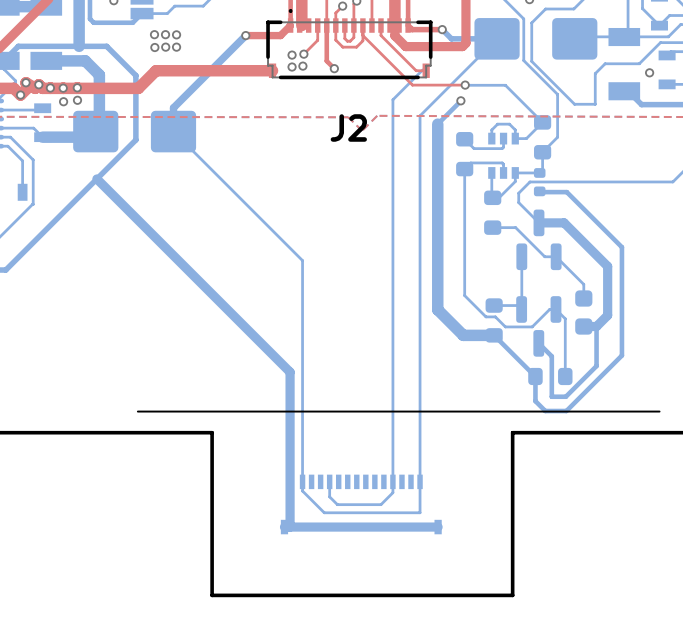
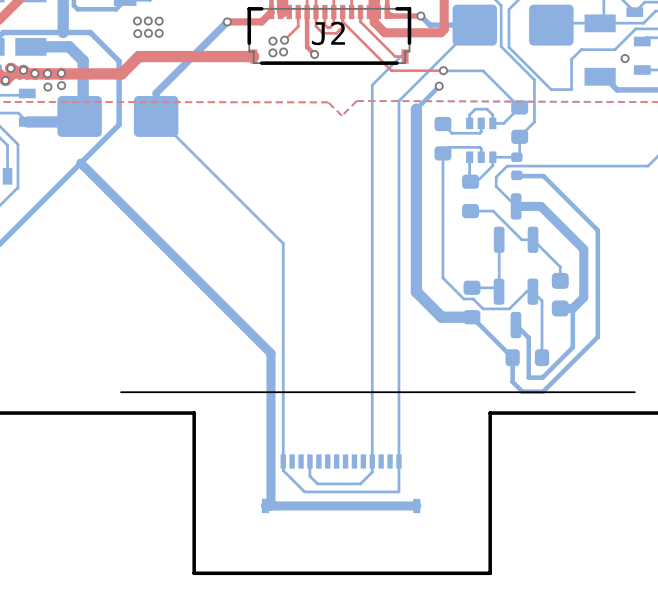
J2 name position: J2 (348, 127) -> J2 (328, 33)

